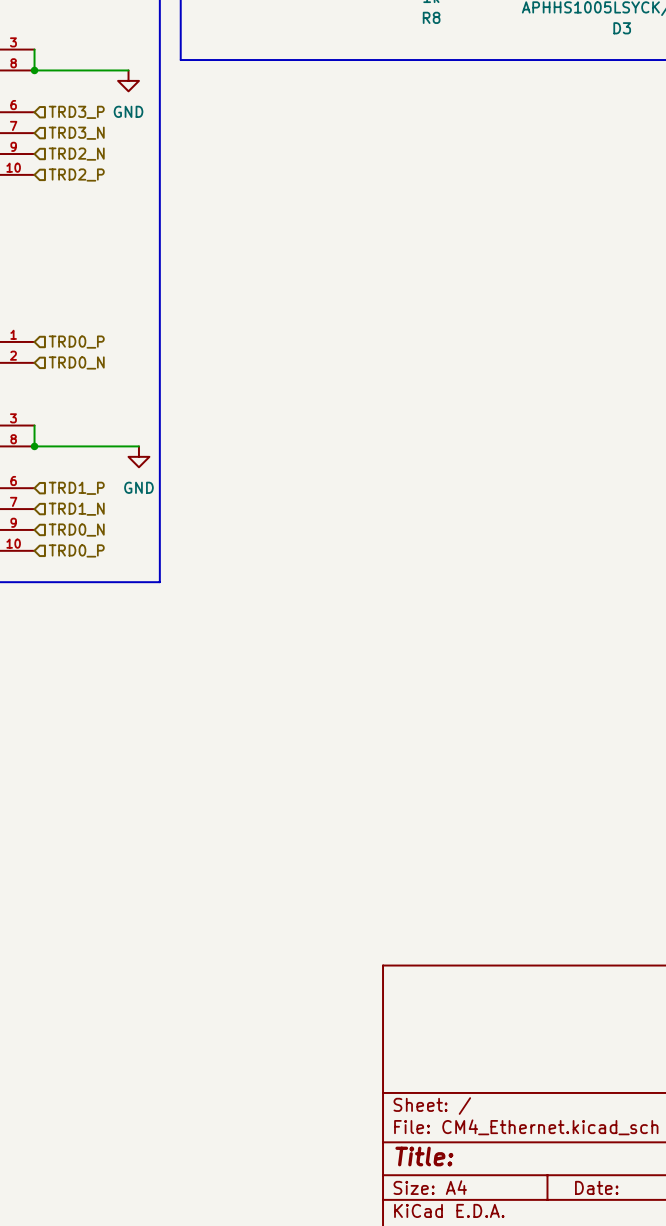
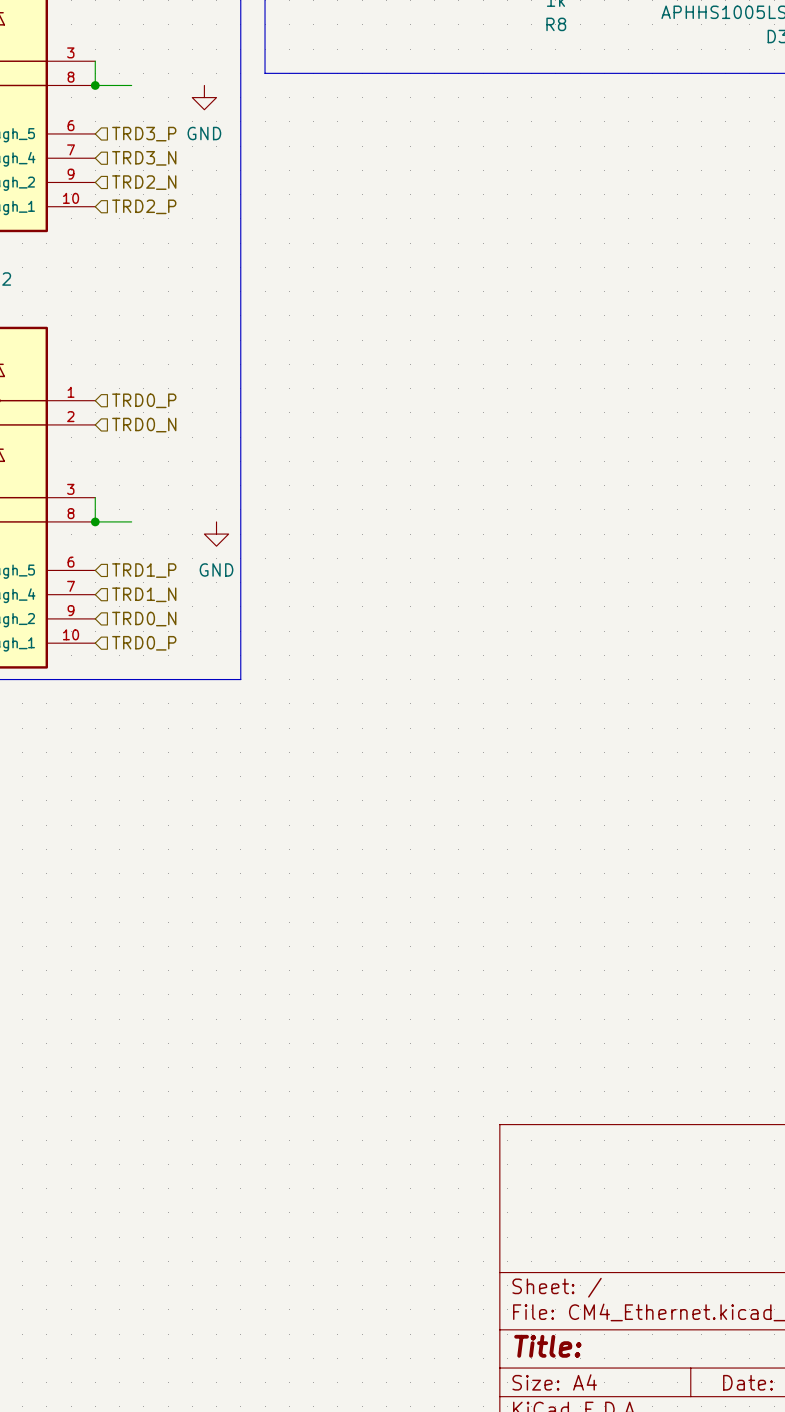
wire: (65, 70) (128, 70) -> none
wire: (65, 446) (138, 446) -> none

